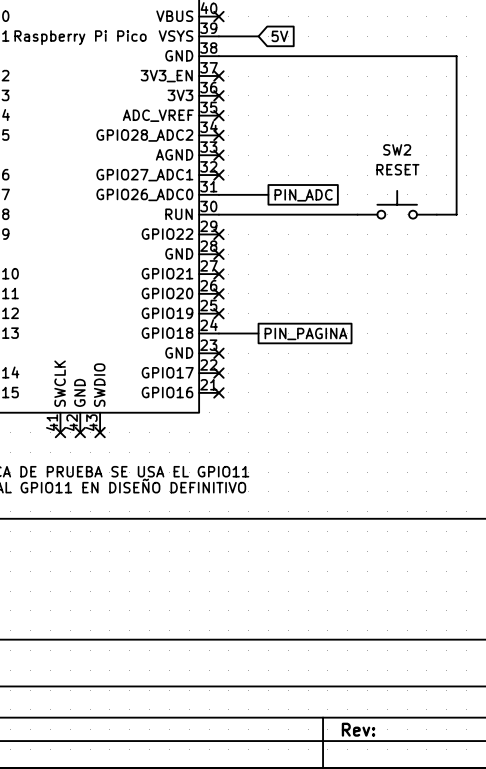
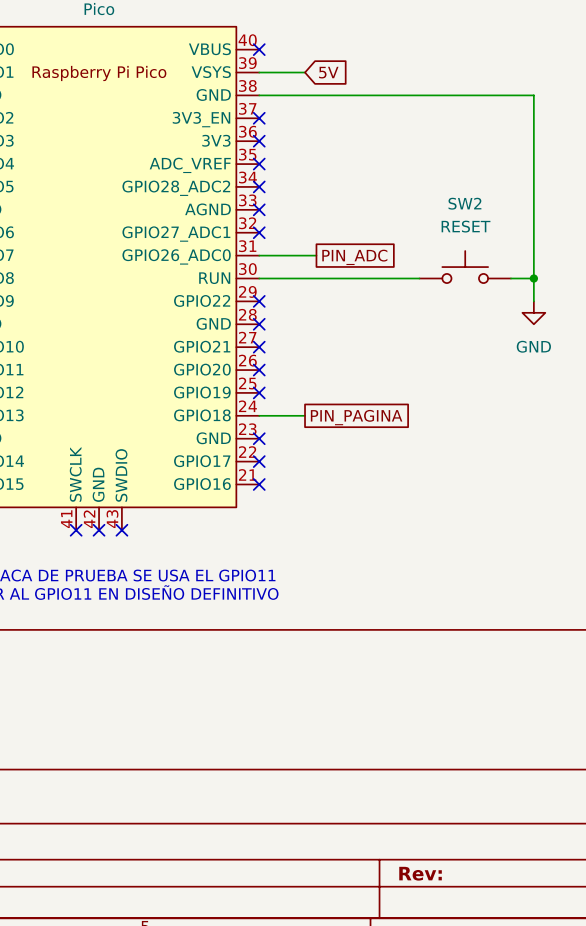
wire: none -> (533, 278) (533, 301)
junction: none -> (533, 278)
power symbol: none -> GND (533, 312)

